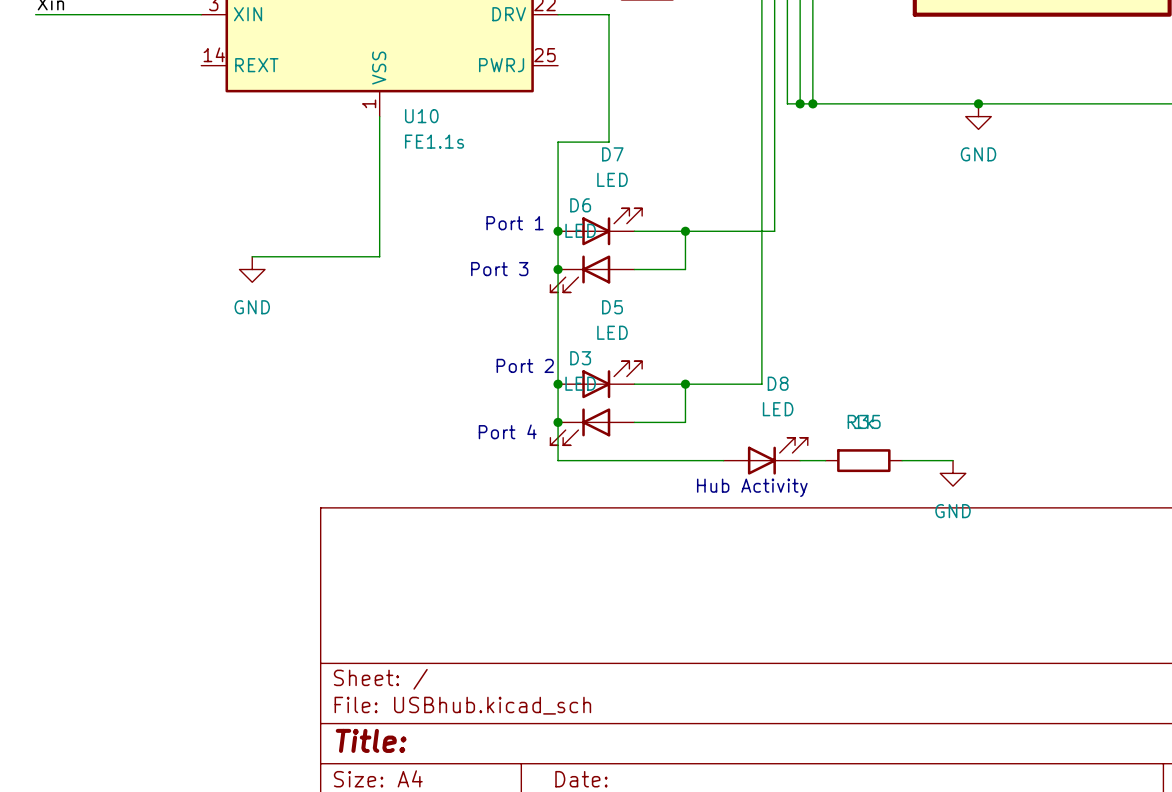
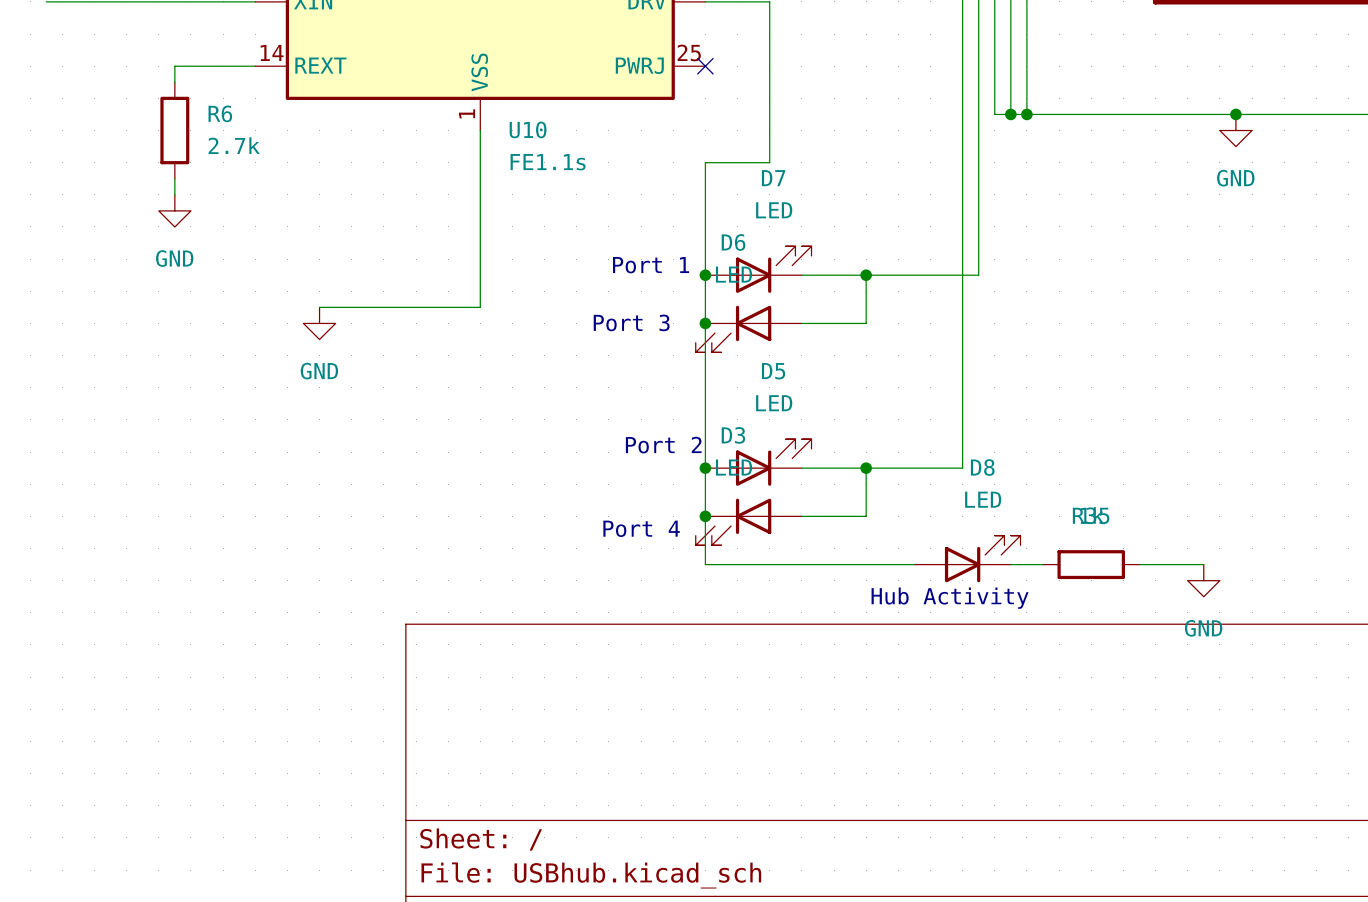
wire: none -> (255, 66) (174, 66) (174, 82)
no-connect mark: none -> (705, 66)
R6: none -> 2.7k (174, 130)
wire: none -> (174, 178) (174, 194)
power symbol: none -> GND (174, 210)

